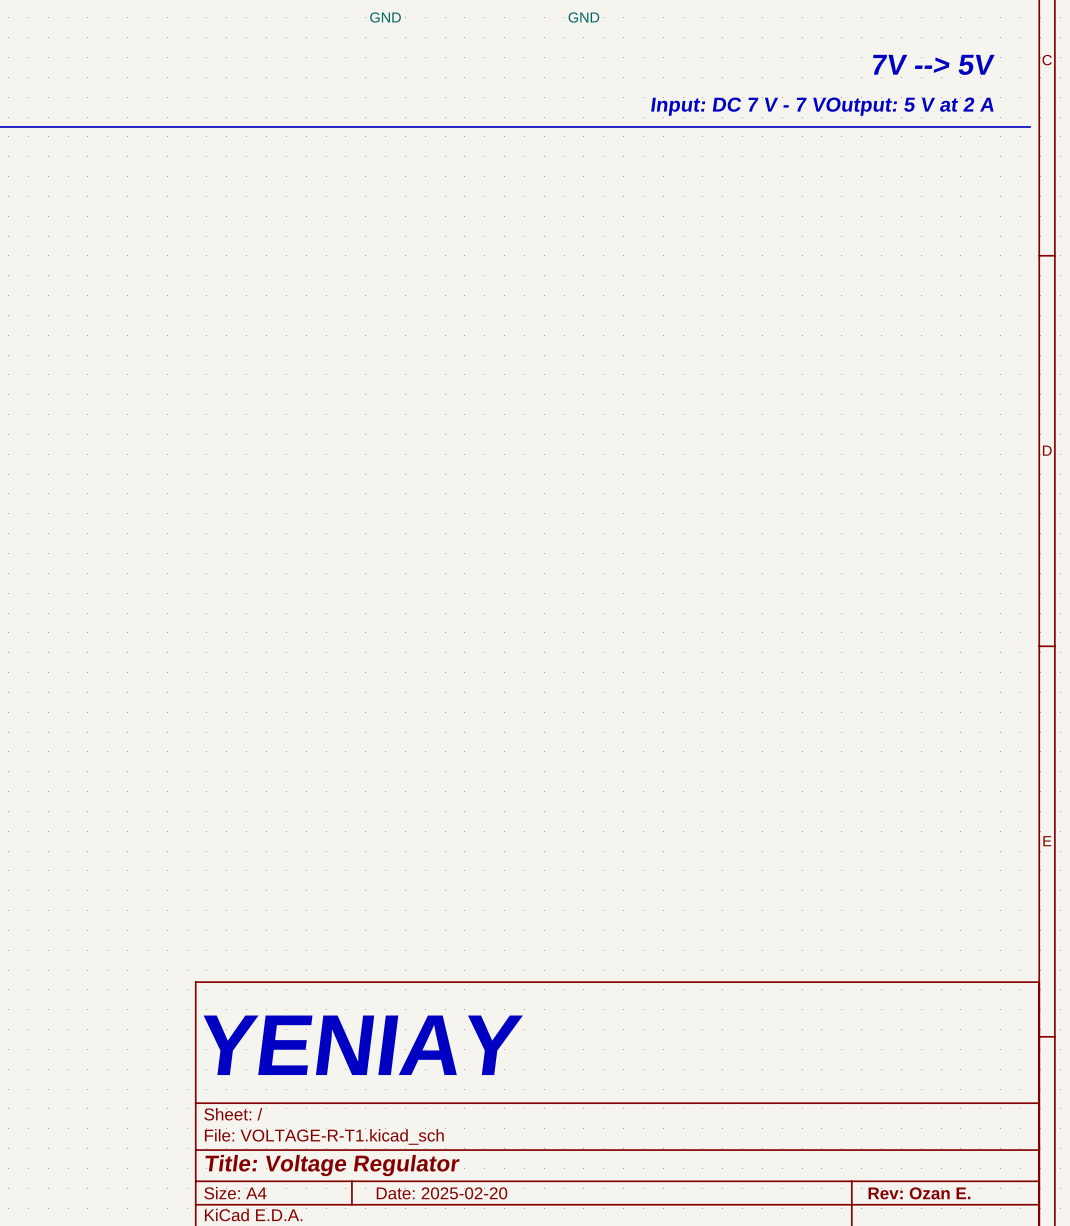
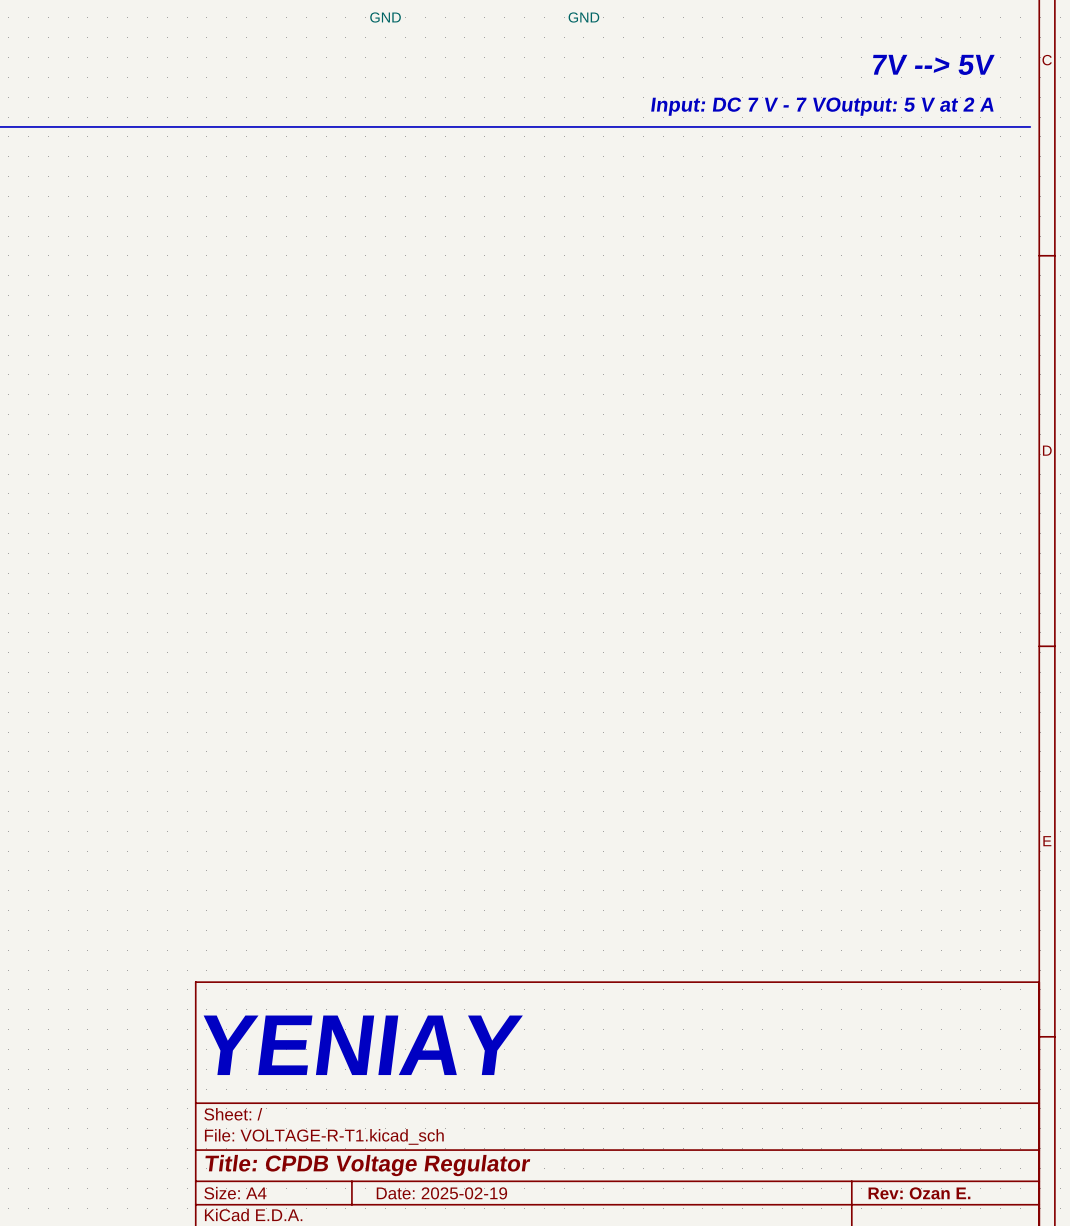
title block: Title: Voltage Regulator (332, 1165) -> Title: CPDB Voltage Regulator (367, 1165)
title block: Date: 2025-02-20 (442, 1193) -> Date: 2025-02-19 (441, 1193)

